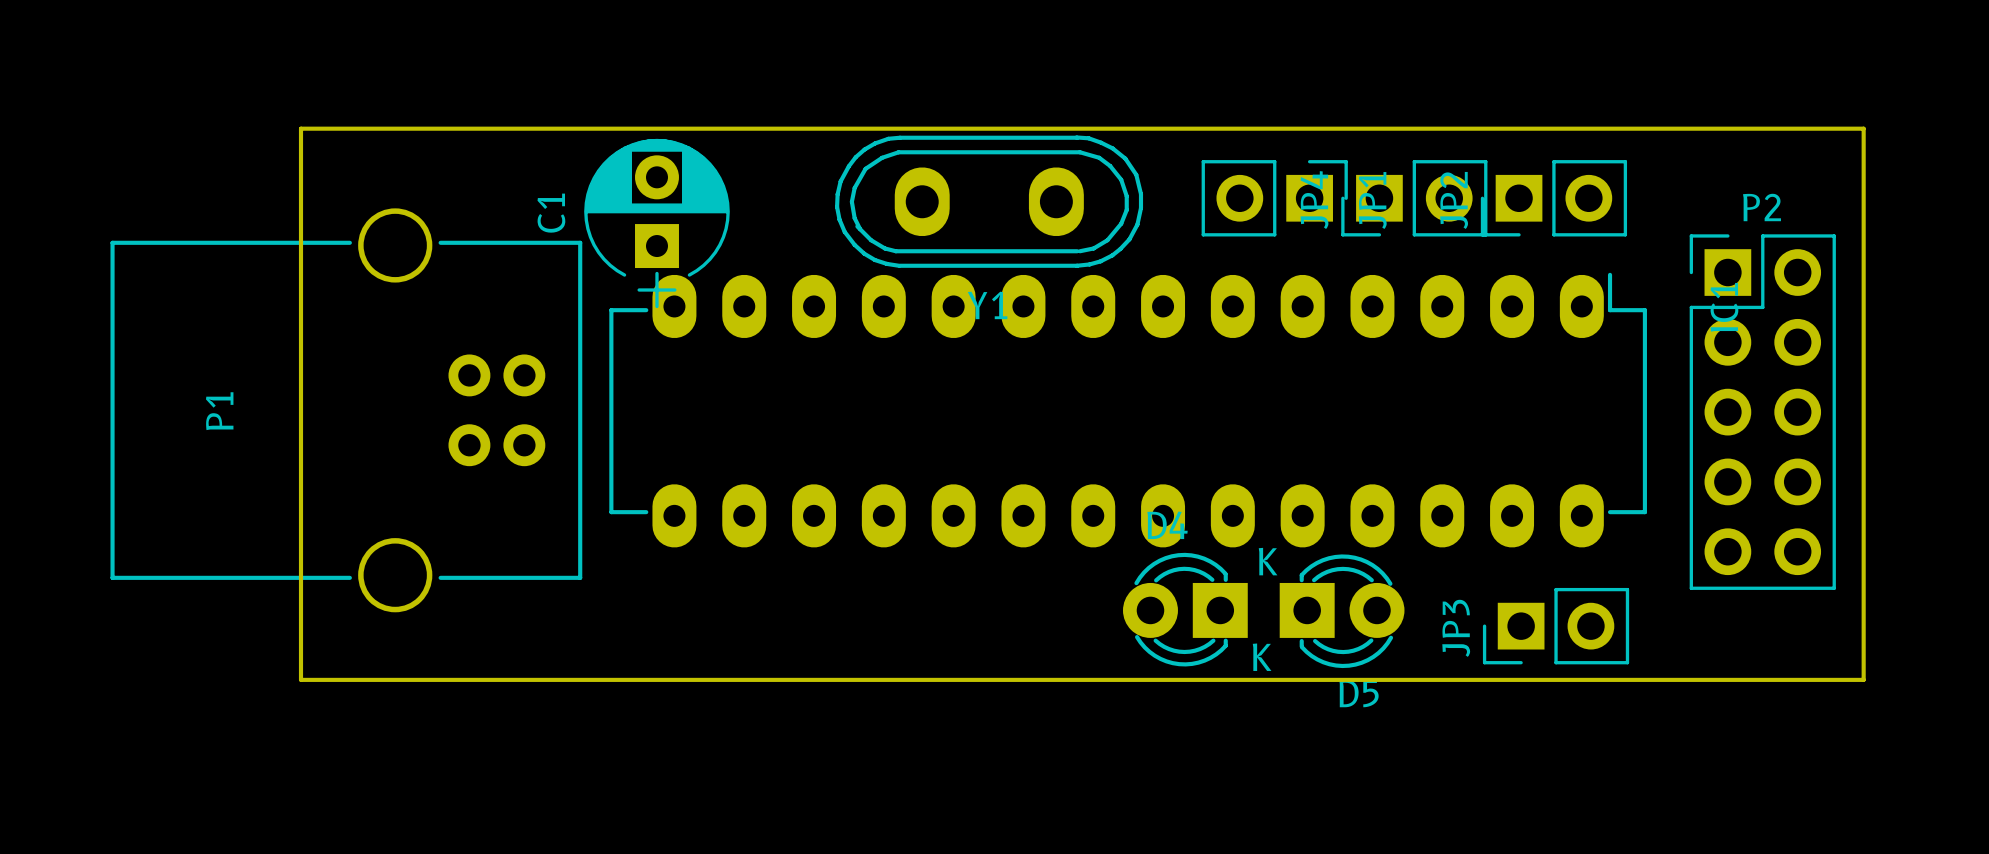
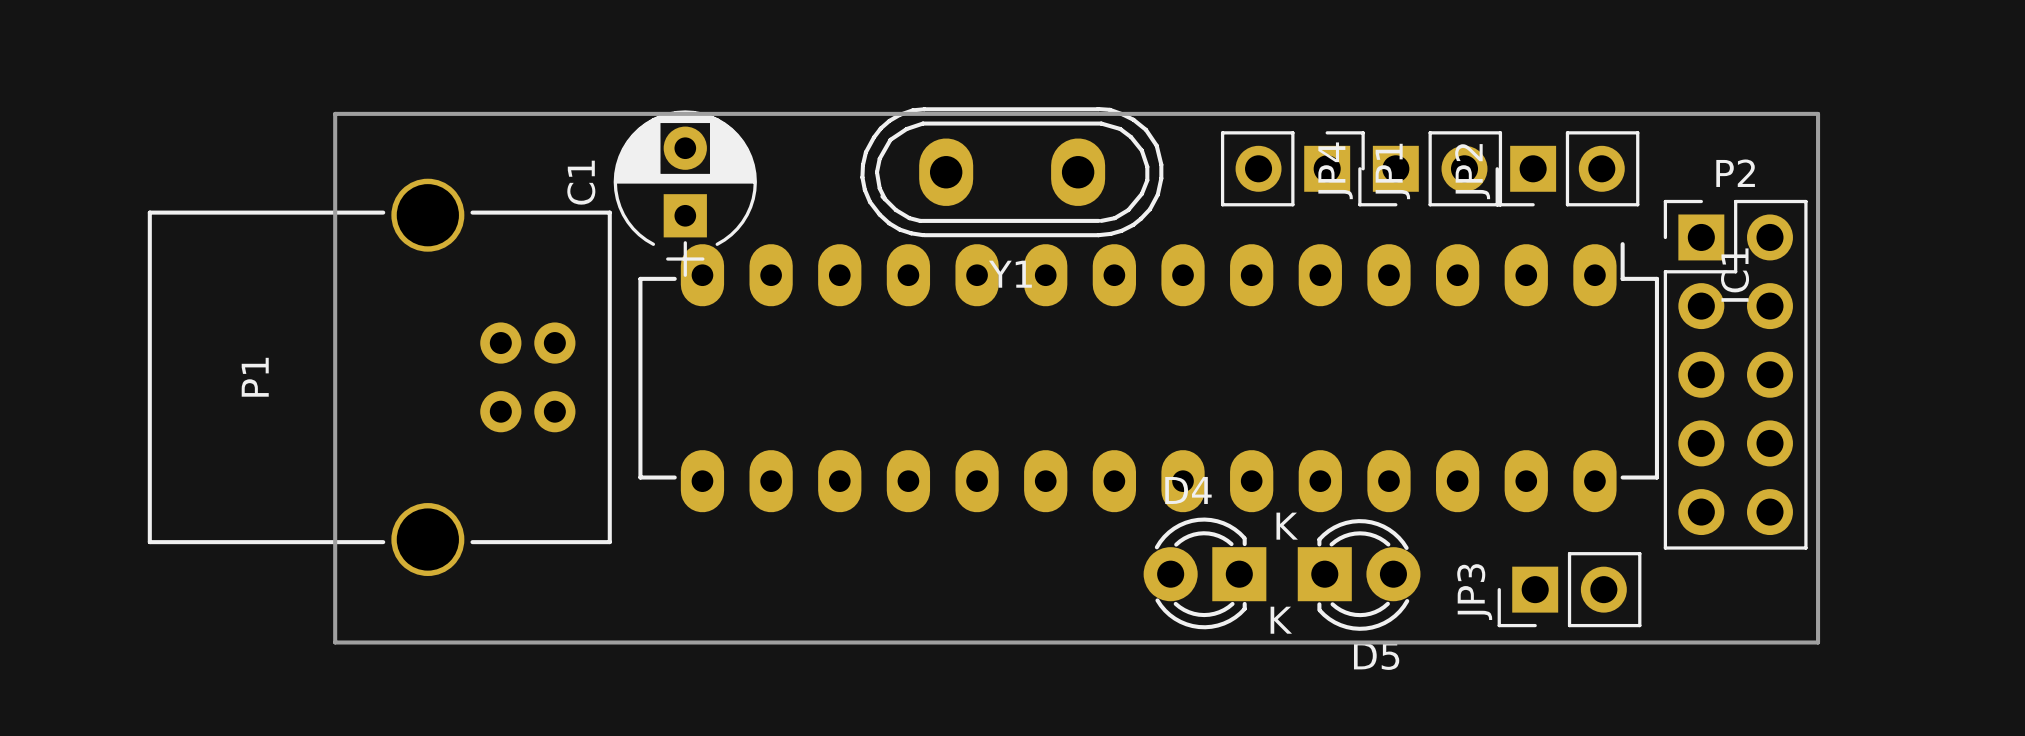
board edge: (301, 142) (301, 128) (1863, 128) (1863, 679) (1808, 679) -> (335, 113) (1818, 113) (1818, 642)
P2 position: (1762, 412) -> (1735, 374)

